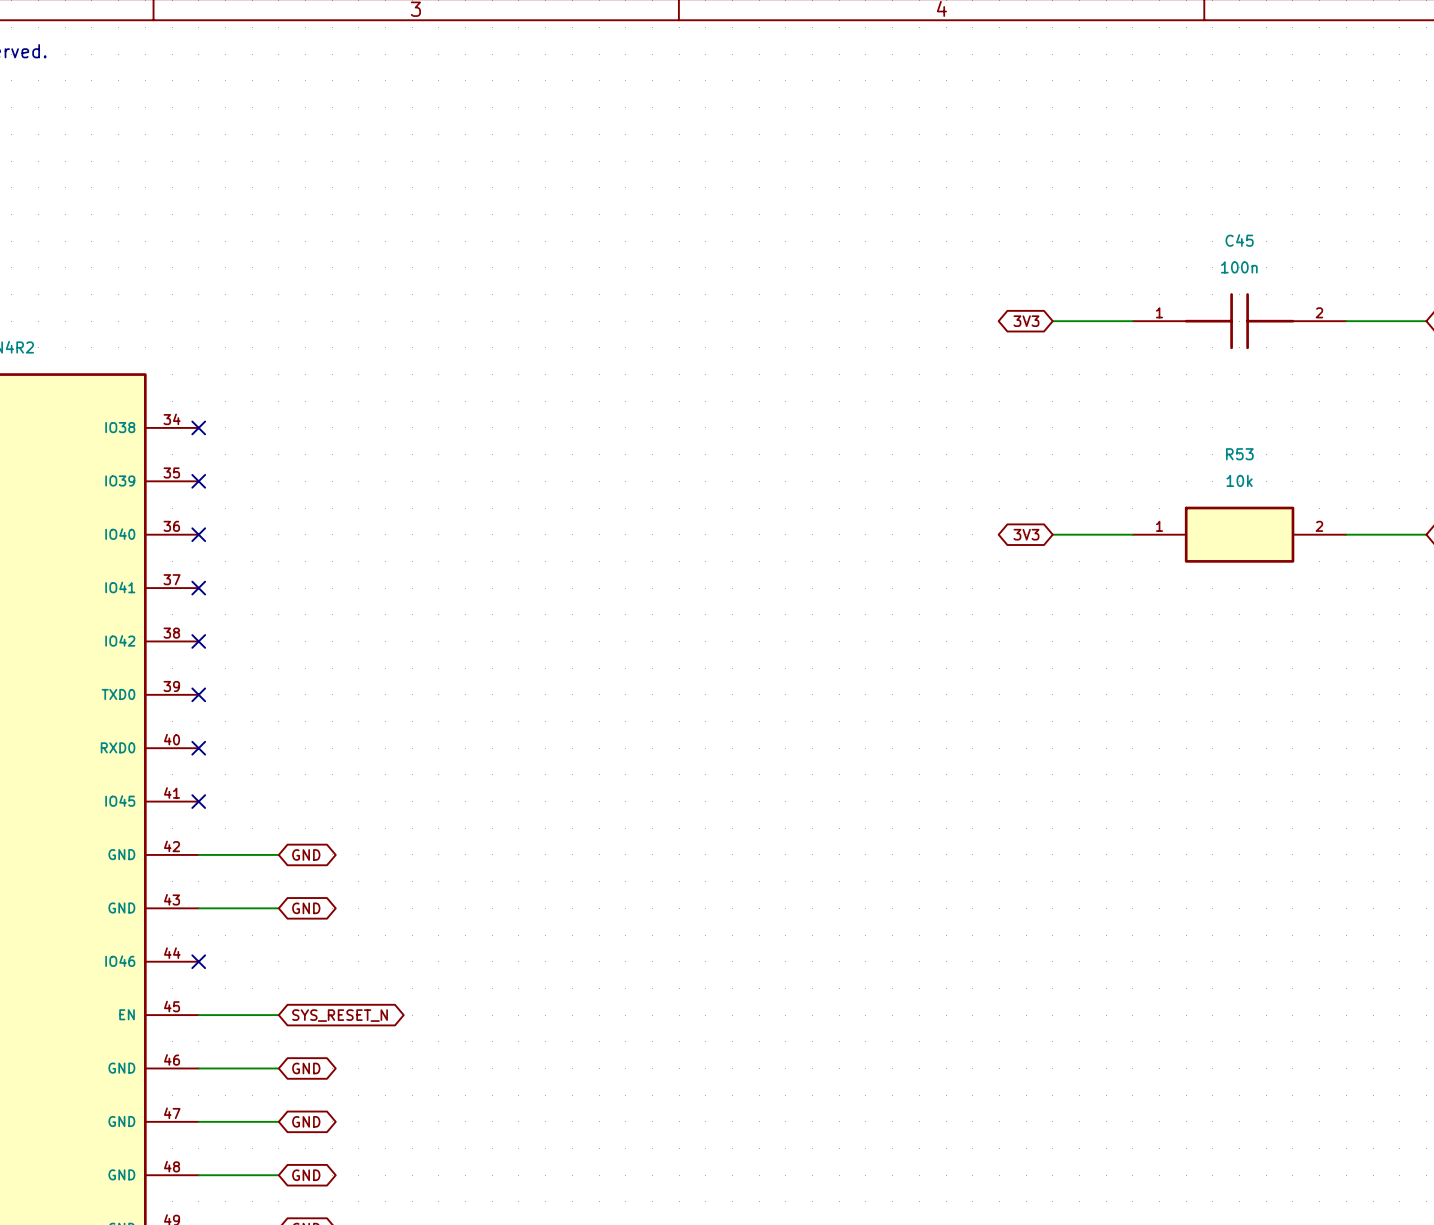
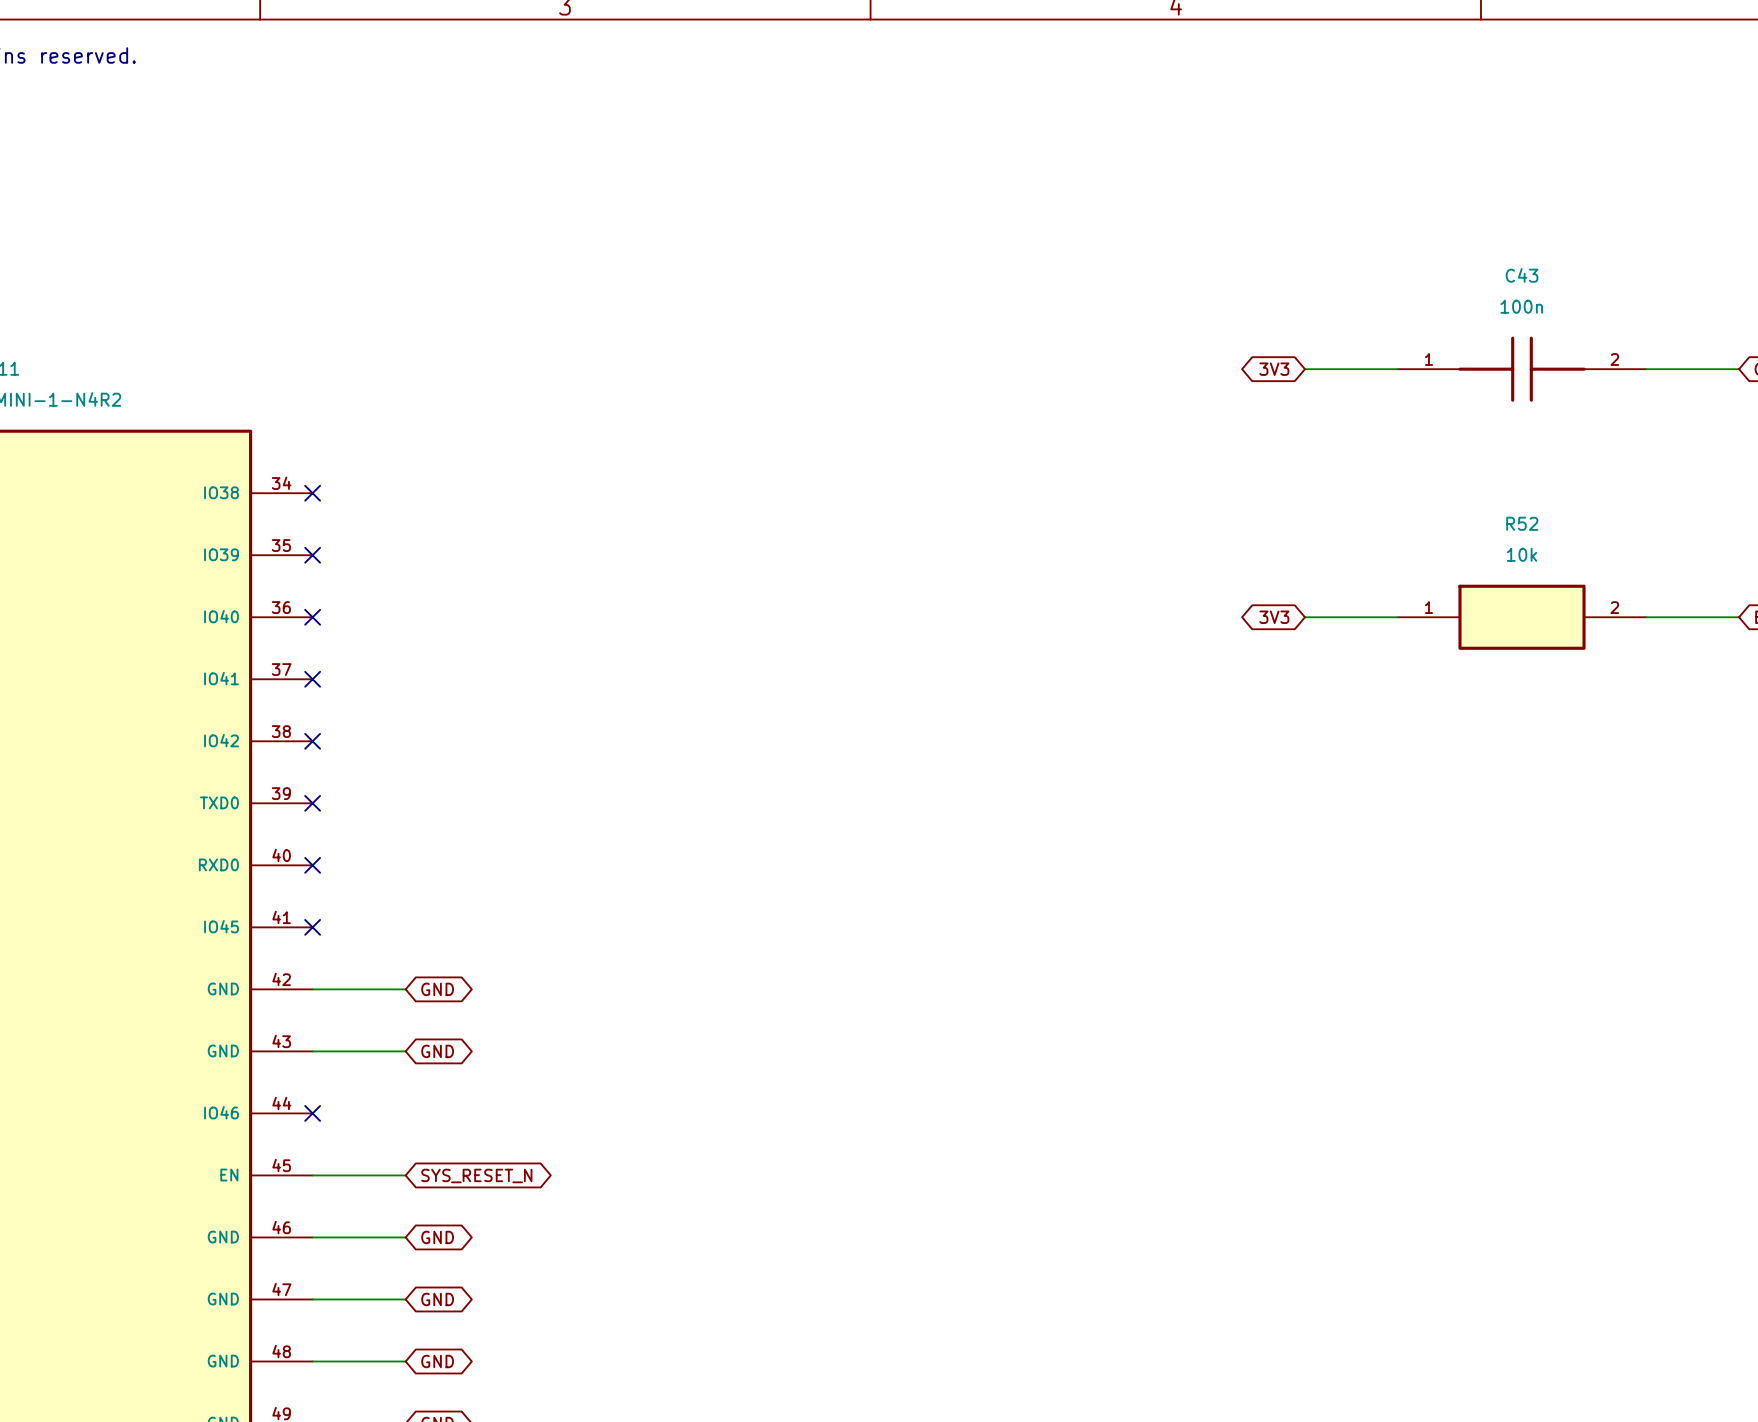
C45 name: C45 (1239, 240) -> C43 (1522, 275)
R53 name: R53 (1239, 454) -> R52 (1522, 523)

